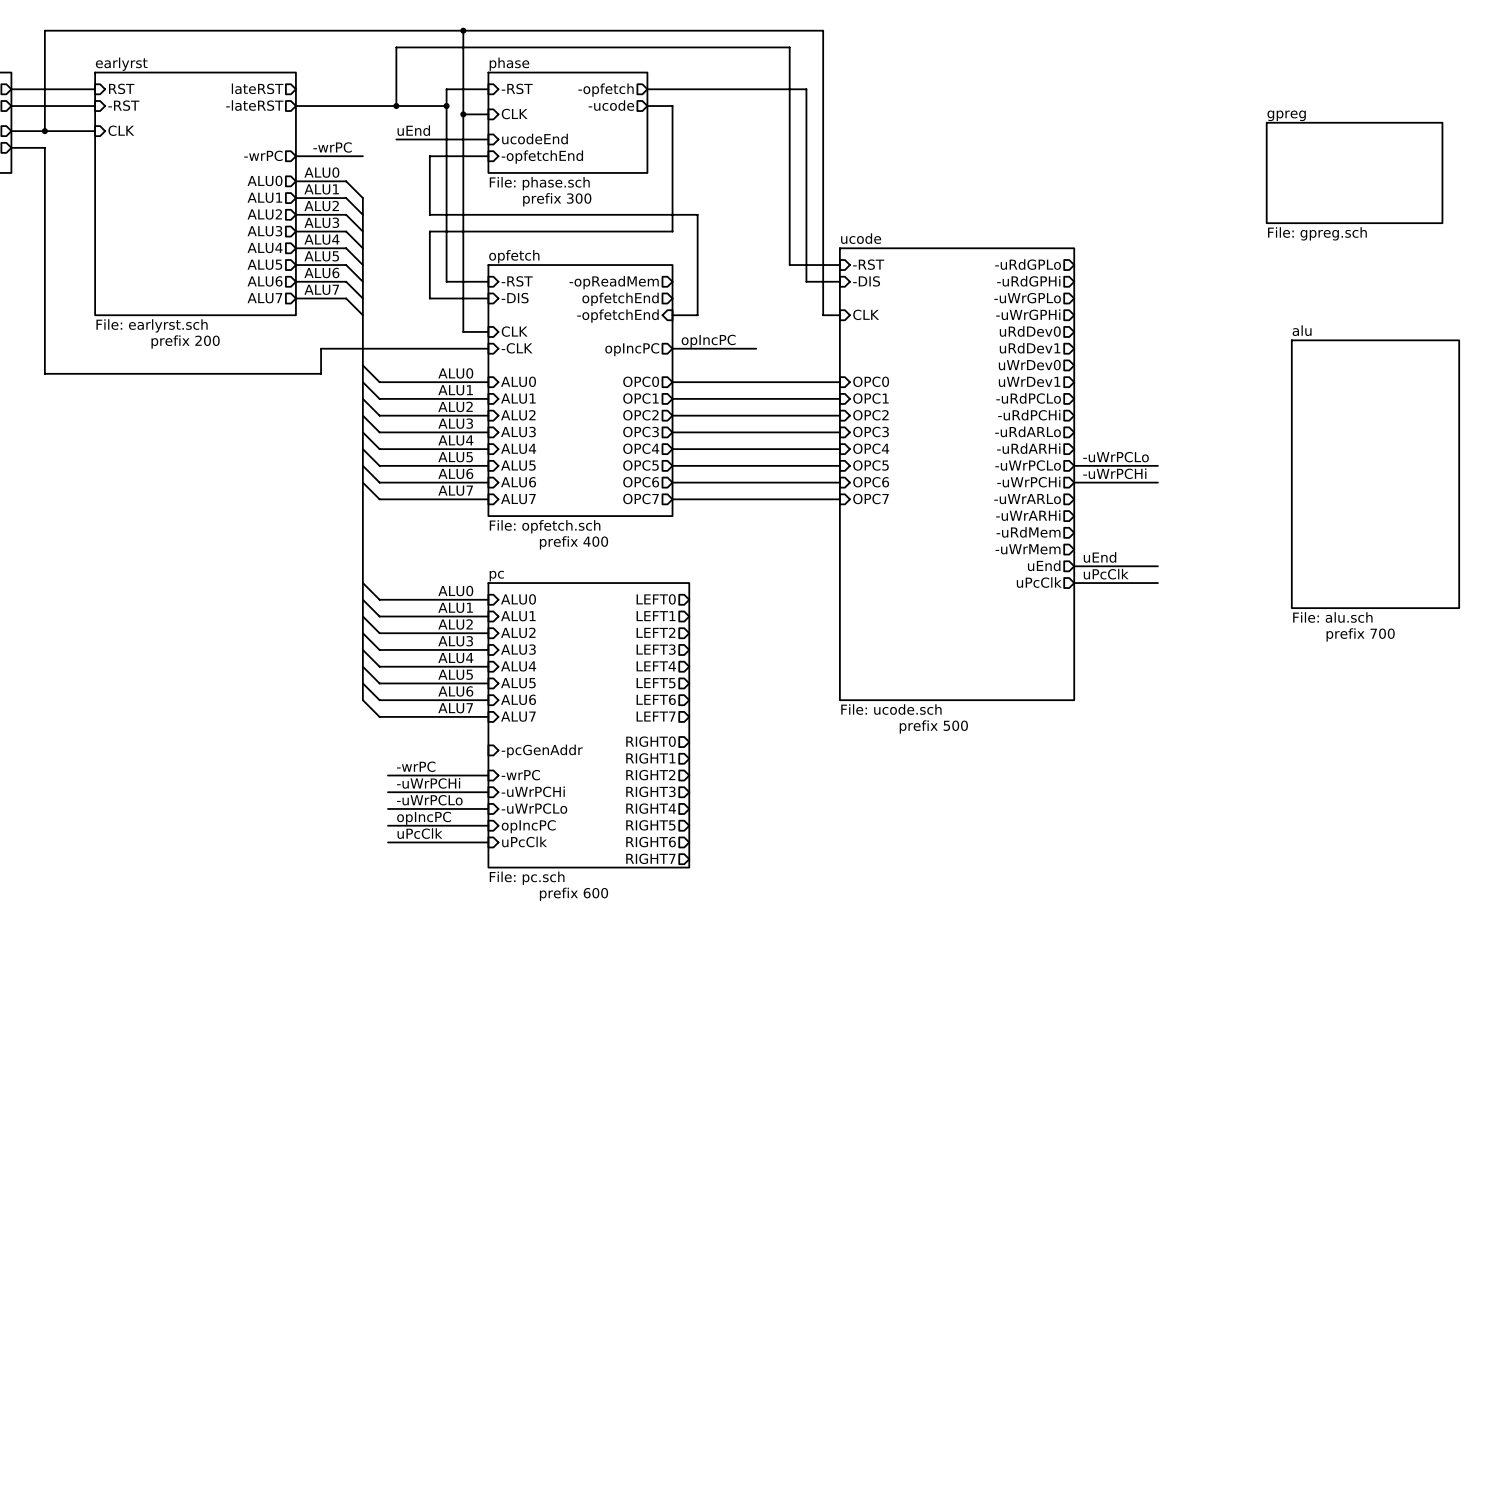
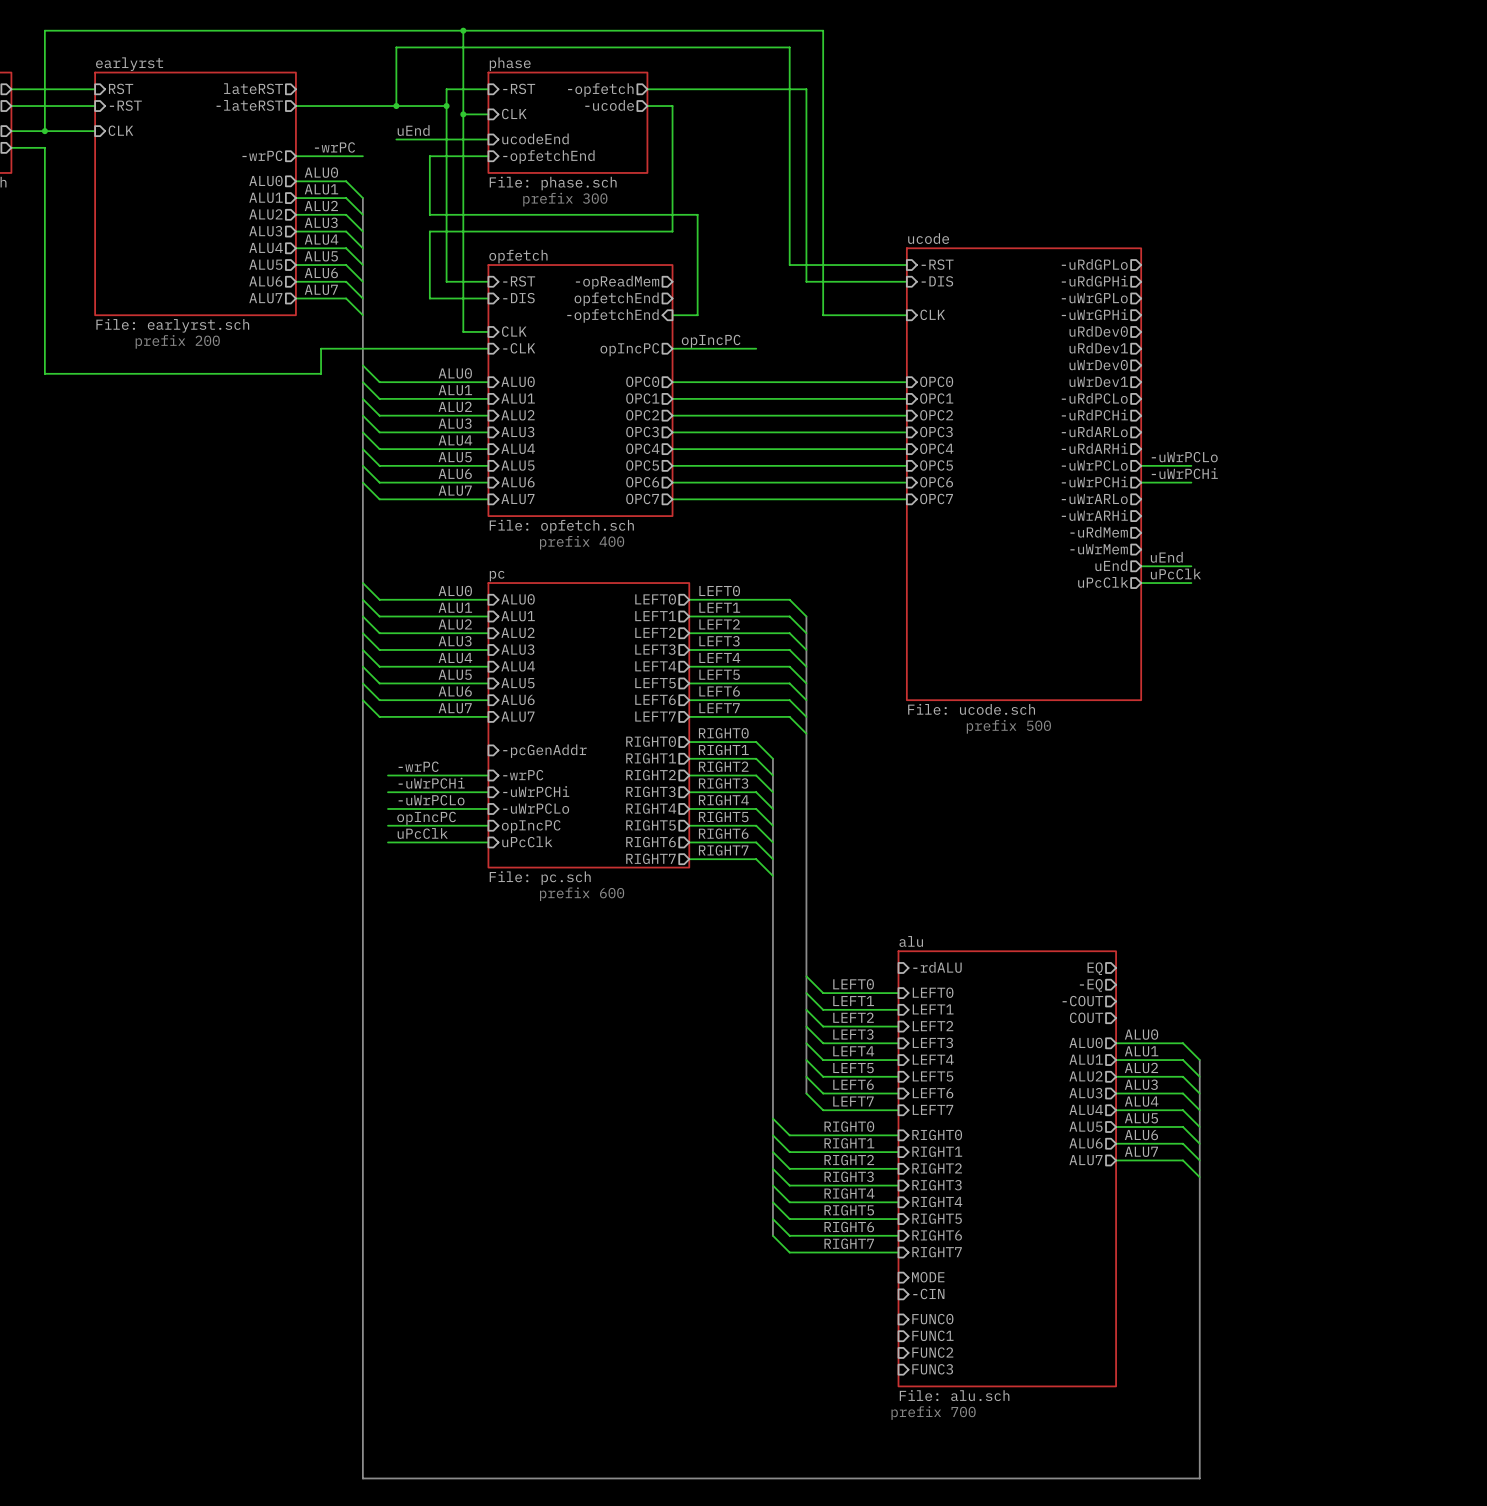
sheet gpreg: File: gpreg.sch (1354, 172) -> none
sheet pin position: -RST (868, 264) -> -RST (937, 264)
sheet pin position: -uRdGPLo (1028, 264) -> -uRdGPLo (1094, 264)
wire: none -> (839, 265) (906, 265)
wire: none -> (839, 281) (906, 281)
sheet pin position: -DIS (866, 281) -> -DIS (937, 281)
sheet pin position: -uRdGPHi (1028, 281) -> -uRdGPHi (1094, 281)
sheet pin position: -uWrGPLo (1027, 298) -> -uWrGPLo (1094, 298)
sheet pin position: CLK (866, 314) -> CLK (932, 314)
sheet pin position: -uWrGPHi (1028, 314) -> -uWrGPHi (1094, 314)
wire: none -> (839, 315) (906, 315)
sheet pin position: uRdDev0 (1030, 331) -> uRdDev0 (1098, 331)
sheet pin position: uRdDev1 (1030, 348) -> uRdDev1 (1098, 348)
sheet pin position: uWrDev0 (1029, 365) -> uWrDev0 (1098, 365)
sheet pin position: OPC0 (871, 381) -> OPC0 (936, 381)
sheet pin position: uWrDev1 (1029, 381) -> uWrDev1 (1098, 381)
wire: none -> (839, 382) (906, 382)
wire: none -> (839, 398) (906, 398)
sheet pin position: OPC1 (870, 398) -> OPC1 (936, 398)
sheet pin position: -uRdPCLo (1028, 398) -> -uRdPCLo (1094, 398)
wire: none -> (839, 415) (906, 415)
sheet pin position: OPC2 (870, 415) -> OPC2 (936, 415)
sheet pin position: -uRdPCHi (1029, 415) -> -uRdPCHi (1094, 415)
sheet pin position: -uRdARLo (1028, 431) -> -uRdARLo (1094, 431)
wire: none -> (839, 432) (906, 432)
sheet pin position: OPC3 (871, 432) -> OPC3 (936, 432)
sheet pin position: OPC4 (871, 448) -> OPC4 (936, 448)
sheet pin position: -uRdARHi (1028, 448) -> -uRdARHi (1094, 448)
wire: none -> (839, 449) (906, 449)
label position: -uWrPCLo (1116, 457) -> -uWrPCLo (1184, 457)
wire: none -> (839, 465) (906, 465)
sheet pin position: OPC5 (871, 465) -> OPC5 (936, 465)
sheet pin position: -uWrPCLo (1028, 465) -> -uWrPCLo (1094, 465)
wire: (1074, 465) (1141, 465) -> none
wire: none -> (1157, 465) (1191, 465)
label position: -uWrPCHi (1114, 473) -> -uWrPCHi (1184, 473)
sheet ucode position: (957, 474) -> (1024, 474)
sheet alu: File: alu.sch (1375, 474) -> none
wire: none -> (839, 482) (906, 482)
sheet pin position: OPC6 (871, 482) -> OPC6 (936, 482)
sheet pin position: -uWrPCHi (1028, 482) -> -uWrPCHi (1094, 481)
wire: (1074, 482) (1141, 482) -> none
wire: none -> (1157, 482) (1191, 482)
sheet pin position: OPC7 (871, 498) -> OPC7 (936, 498)
wire: none -> (839, 499) (906, 499)
sheet pin position: -uWrARLo (1027, 499) -> -uWrARLo (1094, 499)
sheet pin position: -uWrARHi (1028, 515) -> -uWrARHi (1094, 515)
sheet pin position: -uRdMem (1028, 532) -> -uRdMem (1099, 532)
sheet pin position: -uWrMem (1028, 549) -> -uWrMem (1099, 549)
label position: uEnd (1100, 557) -> uEnd (1166, 557)
sheet pin position: uEnd (1044, 565) -> uEnd (1111, 565)
wire: (1074, 566) (1141, 566) -> none
wire: none -> (1157, 566) (1191, 566)
label position: uPcClk (1106, 574) -> uPcClk (1175, 574)
sheet pin position: uPcClk (1039, 582) -> uPcClk (1103, 582)
wire: (1074, 583) (1141, 583) -> none
wire: none -> (1157, 583) (1191, 583)
label: none -> LEFT0 (719, 591)
wire: none -> (689, 599) (789, 599) (806, 616)
label: none -> LEFT1 (719, 607)
wire: none -> (689, 616) (789, 616) (806, 633)
bus: none -> (806, 616) (806, 1093)
label: none -> LEFT2 (719, 624)
wire: none -> (689, 633) (789, 633) (806, 649)
text: prefix 700 (1360, 634) -> none
label: none -> LEFT3 (719, 641)
wire: none -> (689, 649) (789, 649) (806, 666)
label: none -> LEFT4 (719, 657)
wire: none -> (689, 666) (789, 666) (806, 683)
label: none -> LEFT5 (719, 674)
wire: none -> (689, 683) (789, 683) (806, 700)
label: none -> LEFT6 (719, 691)
bus: none -> (362, 700) (362, 1478) (1199, 1478) (1199, 1060)
wire: none -> (689, 700) (789, 700) (806, 716)
label: none -> LEFT7 (719, 708)
wire: none -> (689, 716) (789, 716) (806, 733)
text position: prefix 500 (933, 726) -> prefix 500 (1008, 726)
label: none -> RIGHT0 (723, 733)
wire: none -> (689, 742) (756, 742) (772, 758)
label: none -> RIGHT1 (723, 750)
wire: none -> (689, 758) (756, 758) (772, 775)
bus: none -> (772, 758) (772, 1235)
label: none -> RIGHT2 (723, 766)
wire: none -> (689, 775) (756, 775) (772, 792)
label: none -> RIGHT3 (723, 783)
wire: none -> (689, 792) (756, 792) (772, 808)
label: none -> RIGHT4 (723, 800)
wire: none -> (689, 808) (756, 808) (772, 825)
label: none -> RIGHT5 (723, 816)
wire: none -> (689, 825) (756, 825) (772, 842)
label: none -> RIGHT6 (723, 833)
wire: none -> (689, 842) (756, 842) (772, 859)
label: none -> RIGHT7 (723, 850)
wire: none -> (689, 859) (756, 859) (772, 875)
sheet pin: none -> -rdALU (937, 967)
sheet pin: none -> EQ (1095, 968)
wire: none -> (806, 976) (823, 993) (898, 993)
label: none -> LEFT0 (853, 984)
sheet pin: none -> -EQ (1091, 985)
sheet pin: none -> LEFT0 (933, 992)
wire: none -> (806, 993) (823, 1009) (898, 1009)
label: none -> LEFT1 (853, 1001)
sheet pin: none -> -COUT (1082, 1001)
wire: none -> (806, 1009) (823, 1026) (898, 1026)
sheet pin: none -> LEFT1 (933, 1009)
label: none -> LEFT2 (853, 1017)
sheet pin: none -> COUT (1086, 1017)
wire: none -> (806, 1026) (823, 1043) (898, 1043)
sheet pin: none -> LEFT2 (933, 1026)
label: none -> LEFT3 (853, 1034)
label: none -> ALU0 (1141, 1034)
sheet pin: none -> LEFT3 (932, 1042)
sheet pin: none -> ALU0 (1086, 1042)
wire: none -> (806, 1043) (823, 1060) (898, 1060)
wire: none -> (1116, 1043) (1183, 1043) (1199, 1060)
label: none -> LEFT4 (853, 1051)
label: none -> ALU1 (1141, 1051)
sheet pin: none -> LEFT4 (933, 1059)
sheet pin: none -> ALU1 (1086, 1059)
wire: none -> (806, 1060) (823, 1076) (898, 1076)
wire: none -> (1116, 1060) (1183, 1060) (1199, 1076)
label: none -> LEFT5 (853, 1068)
label: none -> ALU2 (1141, 1068)
wire: none -> (806, 1076) (823, 1093) (898, 1093)
sheet pin: none -> LEFT5 (933, 1076)
sheet pin: none -> ALU2 (1086, 1076)
wire: none -> (1116, 1076) (1183, 1076) (1199, 1093)
label: none -> LEFT6 (853, 1084)
label: none -> ALU3 (1141, 1084)
wire: none -> (806, 1093) (823, 1110) (898, 1110)
sheet pin: none -> LEFT6 (933, 1093)
sheet pin: none -> ALU3 (1085, 1093)
wire: none -> (1116, 1093) (1183, 1093) (1199, 1110)
label: none -> LEFT7 (853, 1101)
label: none -> ALU4 (1141, 1101)
sheet pin: none -> LEFT7 (932, 1109)
sheet pin: none -> ALU4 (1086, 1109)
wire: none -> (1116, 1110) (1183, 1110) (1199, 1126)
wire: none -> (772, 1118) (789, 1135) (898, 1135)
label: none -> ALU5 (1141, 1118)
label: none -> RIGHT0 (849, 1126)
sheet pin: none -> ALU5 (1085, 1126)
wire: none -> (1116, 1126) (1183, 1126) (1199, 1143)
sheet pin: none -> RIGHT0 (937, 1134)
label: none -> ALU6 (1141, 1135)
wire: none -> (772, 1135) (789, 1152) (898, 1152)
label: none -> RIGHT1 (849, 1143)
sheet pin: none -> ALU6 (1086, 1143)
wire: none -> (1116, 1143) (1183, 1143) (1199, 1160)
sheet pin: none -> RIGHT1 (937, 1151)
label: none -> ALU7 (1141, 1151)
wire: none -> (772, 1152) (789, 1168) (898, 1168)
label: none -> RIGHT2 (849, 1160)
sheet pin: none -> ALU7 (1085, 1160)
wire: none -> (1116, 1160) (1183, 1160) (1199, 1177)
wire: none -> (772, 1168) (789, 1185) (898, 1185)
sheet pin: none -> RIGHT2 (937, 1168)
sheet alu: none -> File: alu.sch (1007, 1168)
label: none -> RIGHT3 (849, 1176)
wire: none -> (772, 1185) (789, 1202) (898, 1202)
sheet pin: none -> RIGHT3 (936, 1185)
label: none -> RIGHT4 (849, 1193)
sheet pin: none -> RIGHT4 (937, 1201)
wire: none -> (772, 1202) (789, 1219) (898, 1219)
label: none -> RIGHT5 (849, 1210)
sheet pin: none -> RIGHT5 (937, 1218)
wire: none -> (772, 1219) (789, 1235) (898, 1235)
label: none -> RIGHT6 (849, 1227)
wire: none -> (772, 1235) (789, 1252) (898, 1252)
sheet pin: none -> RIGHT6 (937, 1235)
label: none -> RIGHT7 (849, 1243)
sheet pin: none -> RIGHT7 (937, 1252)
sheet pin: none -> MODE (928, 1277)
sheet pin: none -> -CIN (928, 1293)
sheet pin: none -> FUNC0 (932, 1319)
sheet pin: none -> FUNC1 (932, 1335)
sheet pin: none -> FUNC2 (932, 1352)
sheet pin: none -> FUNC3 (932, 1369)
text: none -> prefix 700 (933, 1413)

